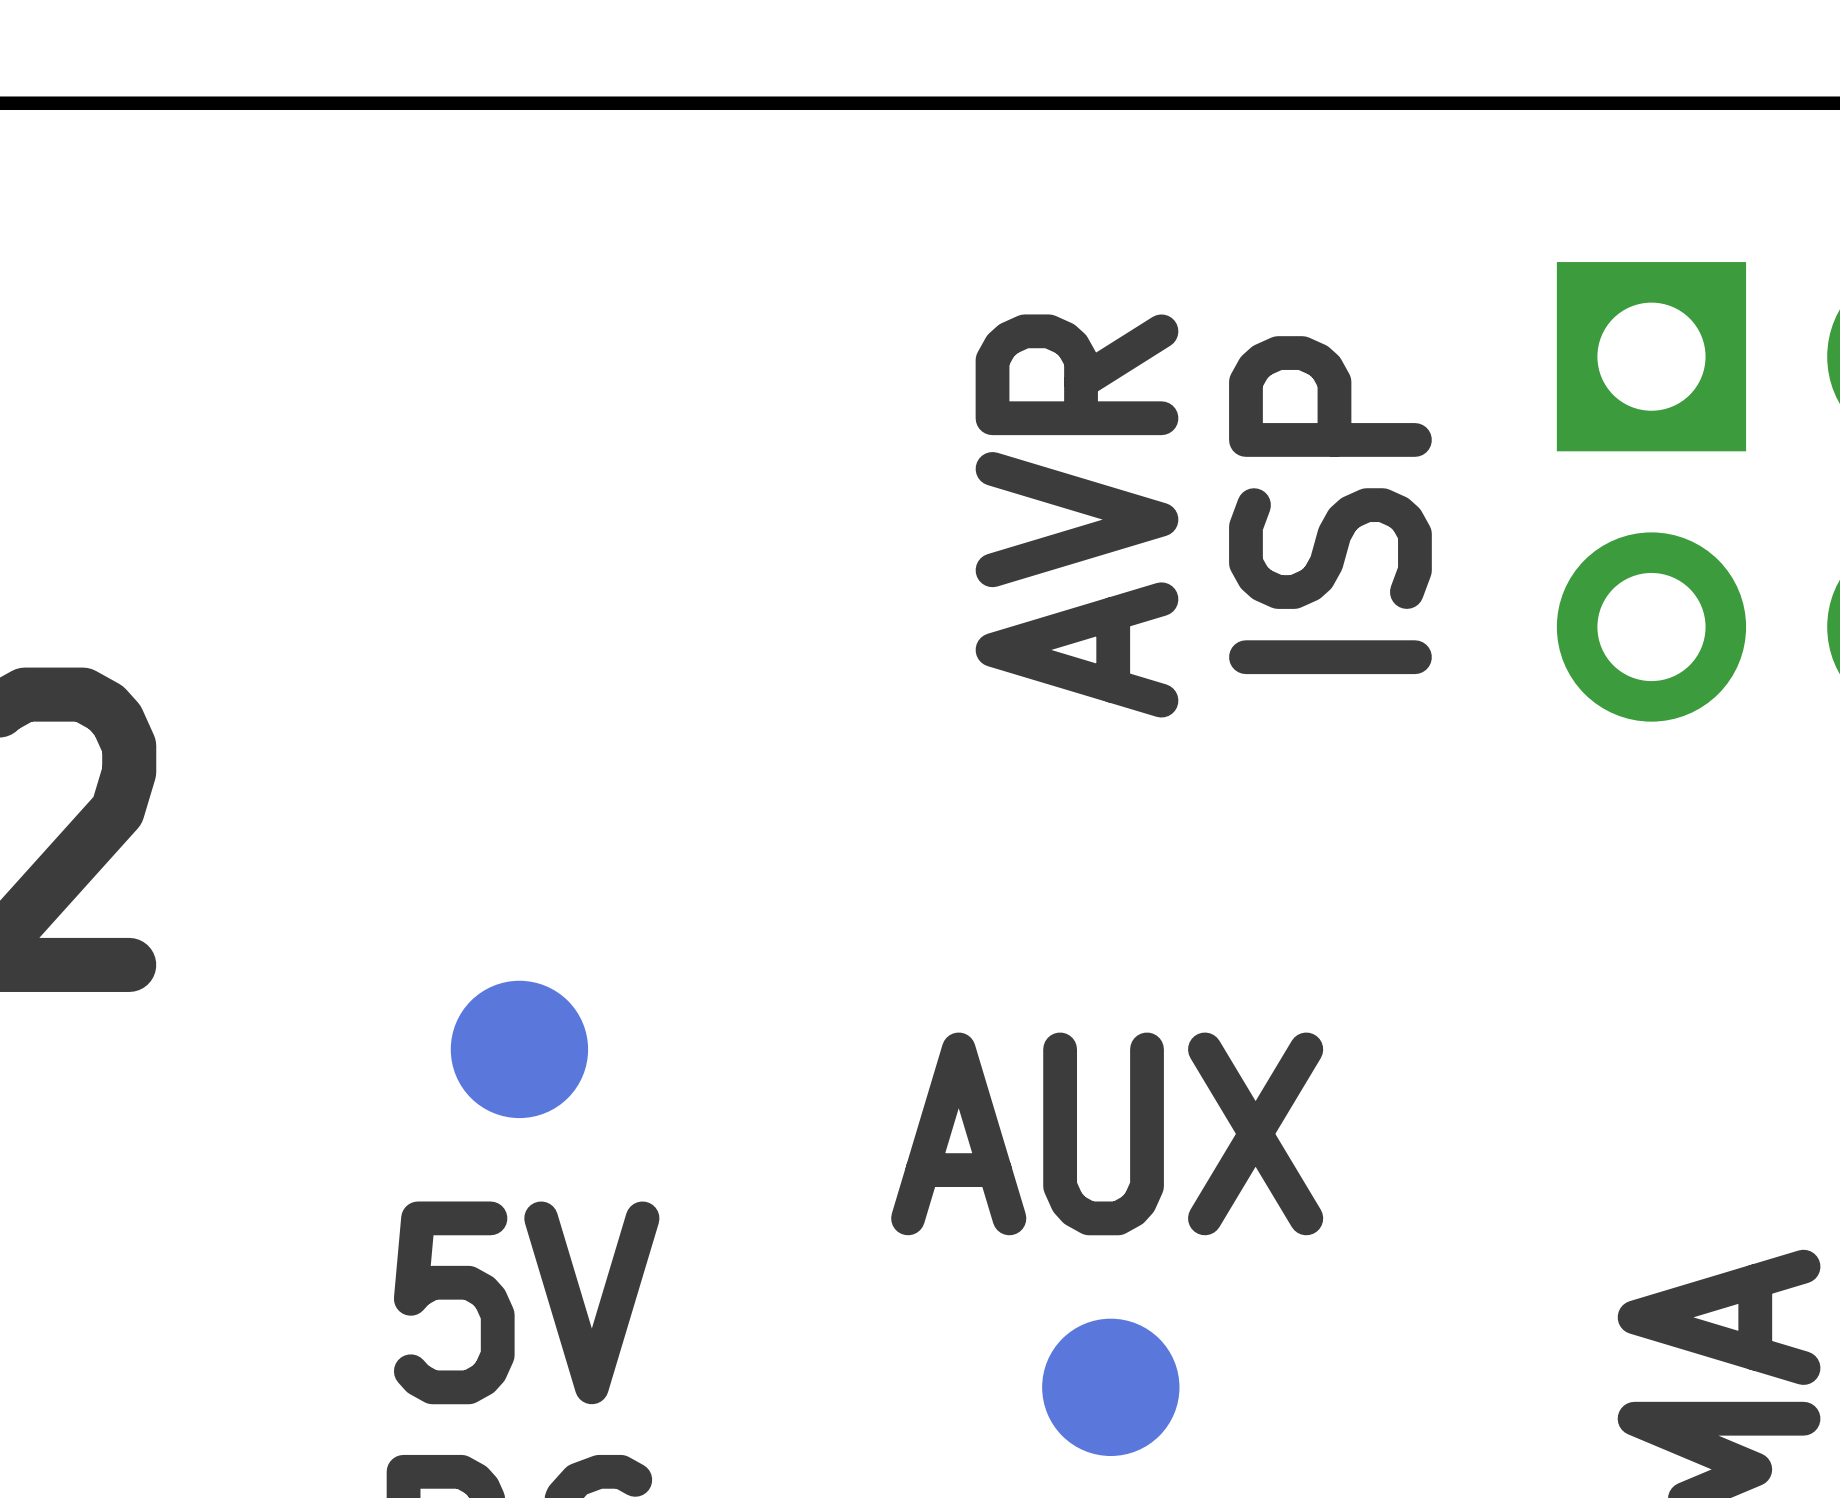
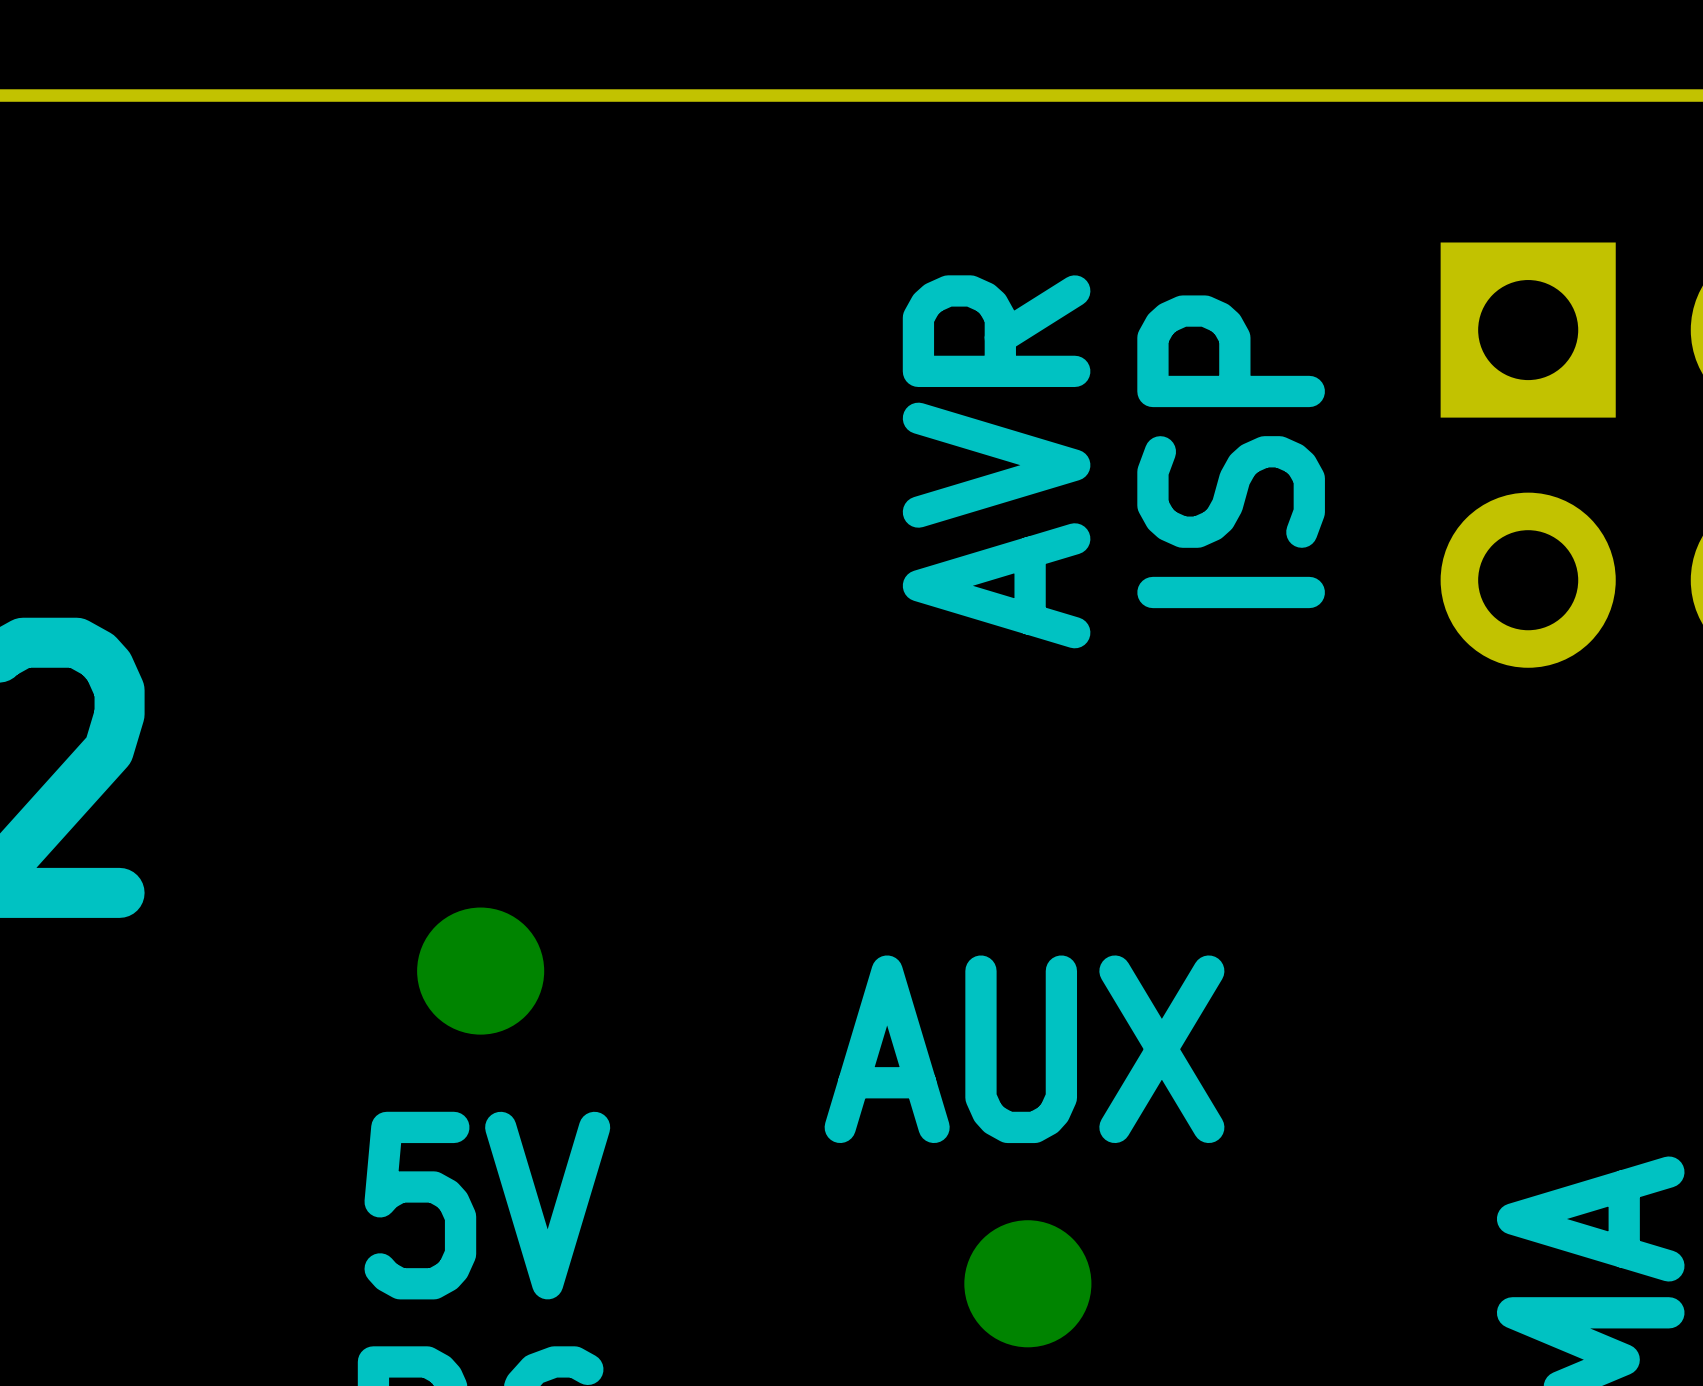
text position: ISP (1330, 505) -> ISP (1231, 451)
text position: AVR (1077, 515) -> AVR (996, 461)

